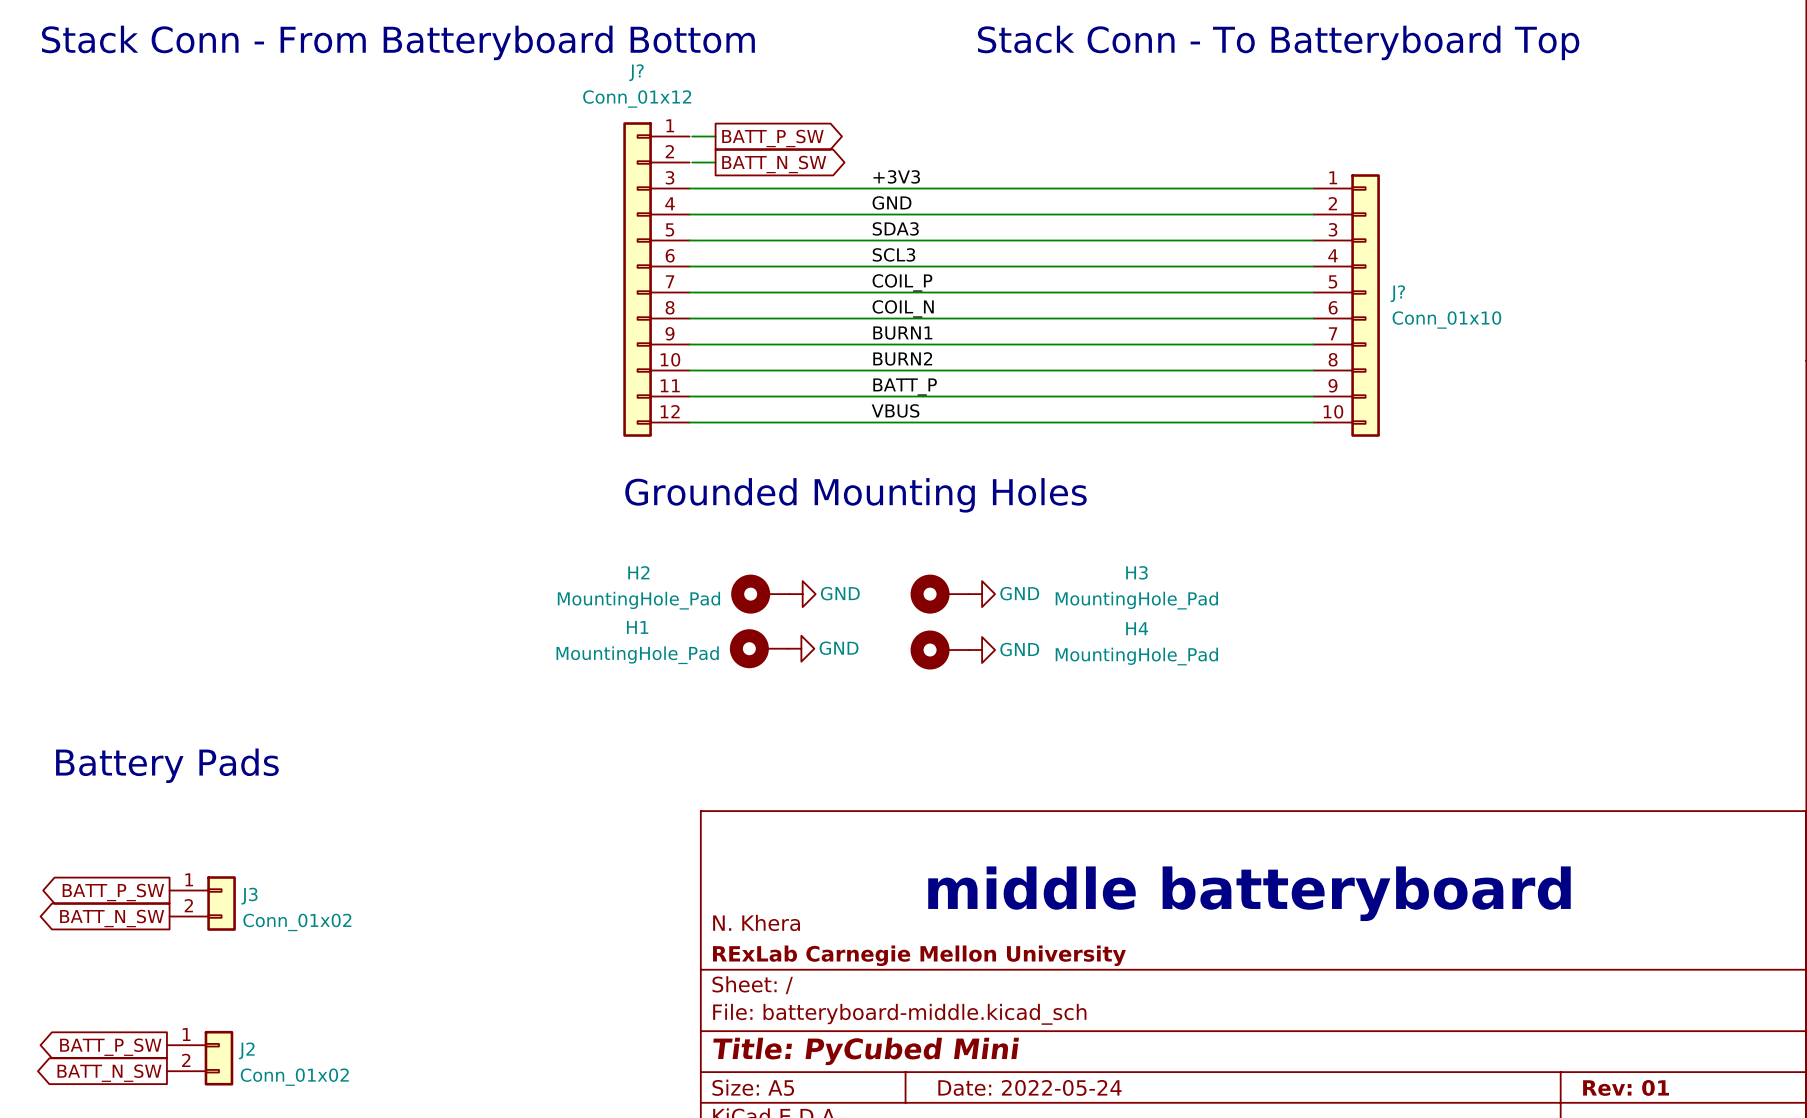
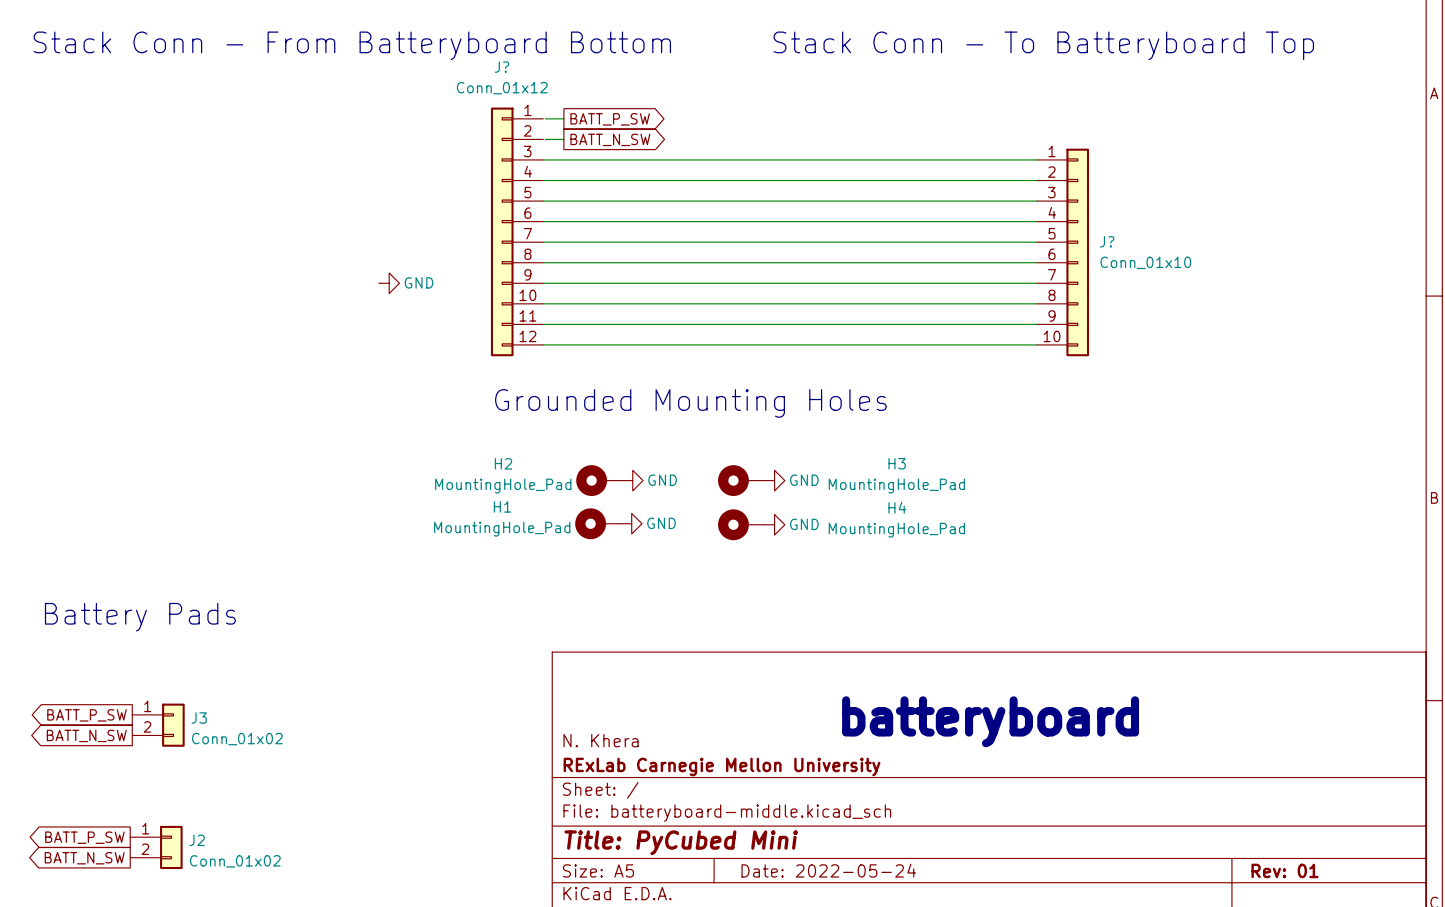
label: +3V3 (896, 176) -> none
label: GND (891, 202) -> none
label: SDA3 (895, 228) -> none
label: SCL3 (893, 254) -> none
label: COIL_P (902, 282) -> none
label: COIL_N (903, 308) -> none
label: BURN1 (902, 333) -> none
power symbol: none -> GND (389, 283)
label: BURN2 (902, 358) -> none
label: BATT_P (905, 387) -> none
label: VBUS (895, 410) -> none
text: middle batteryboard (1249, 893) -> batteryboard (990, 721)

